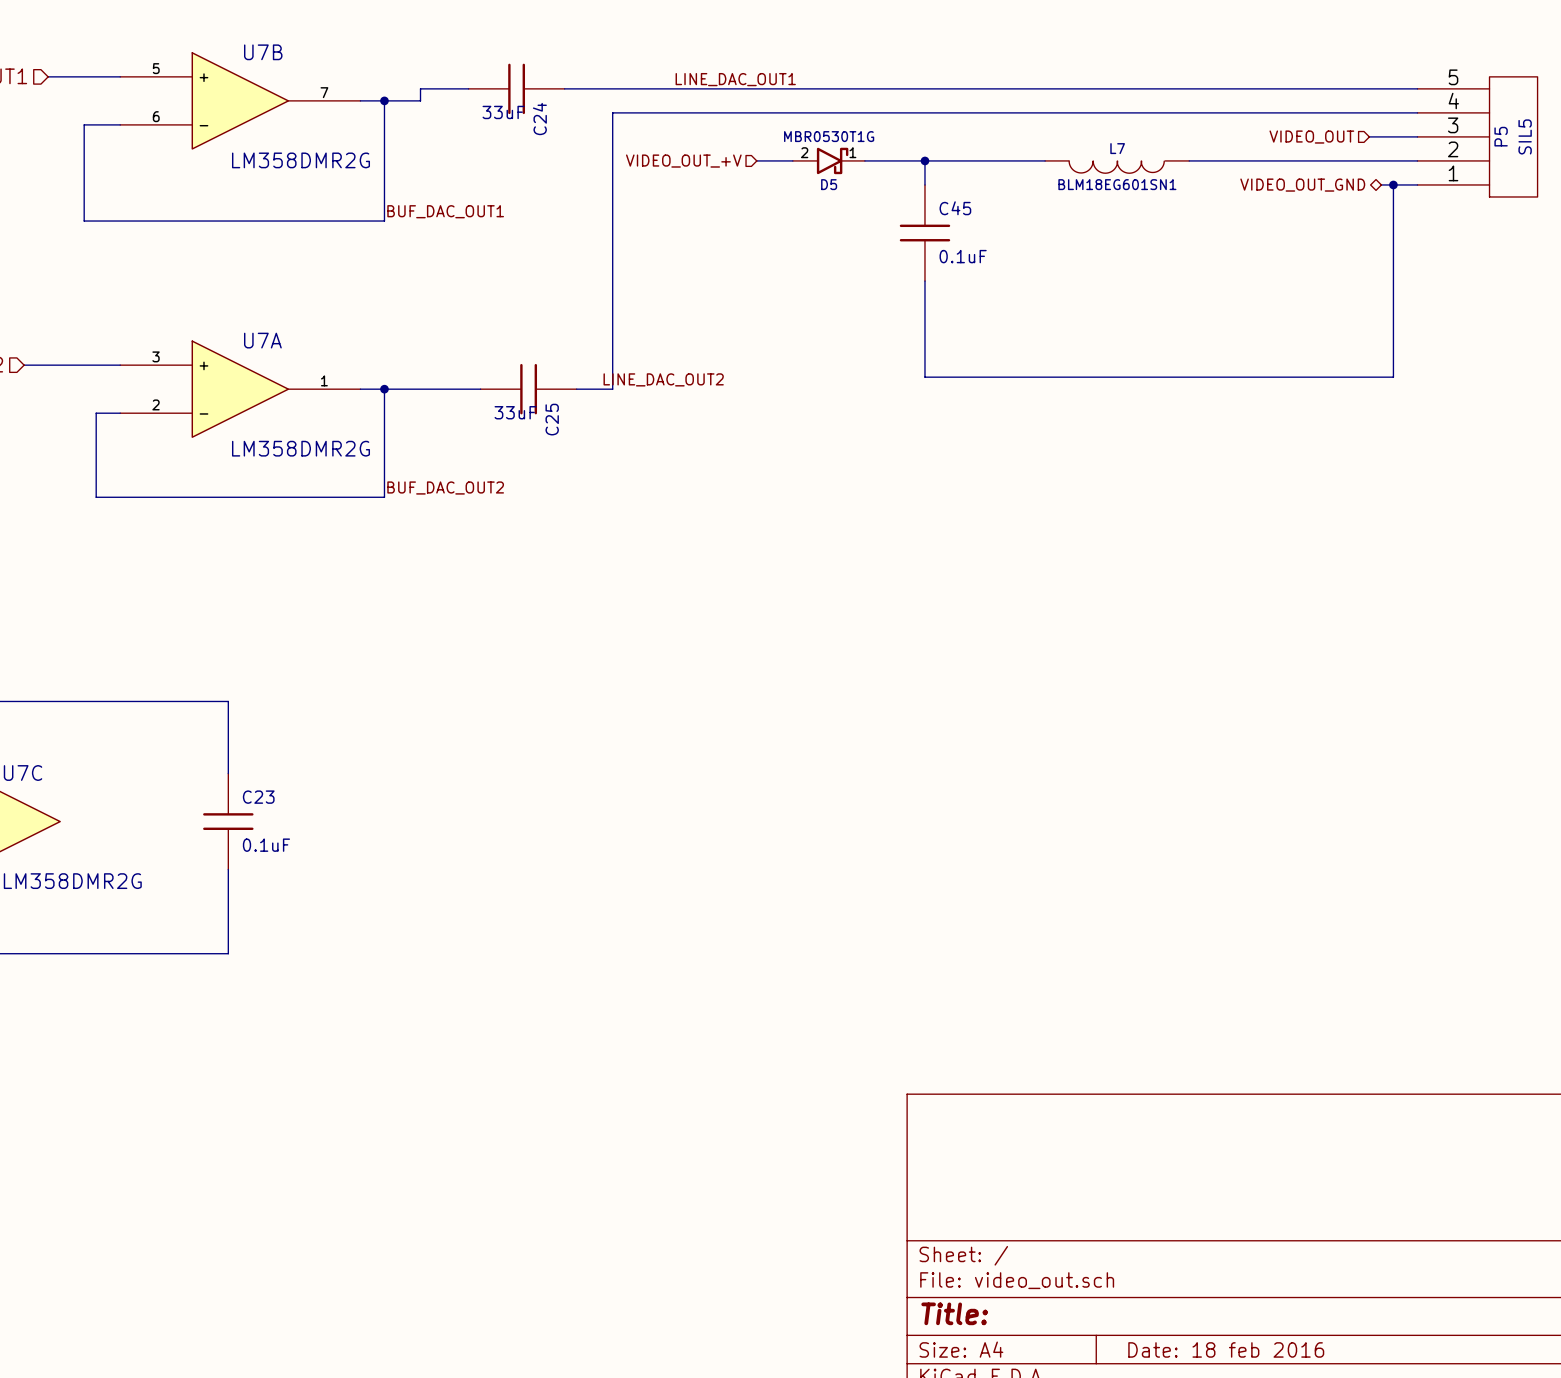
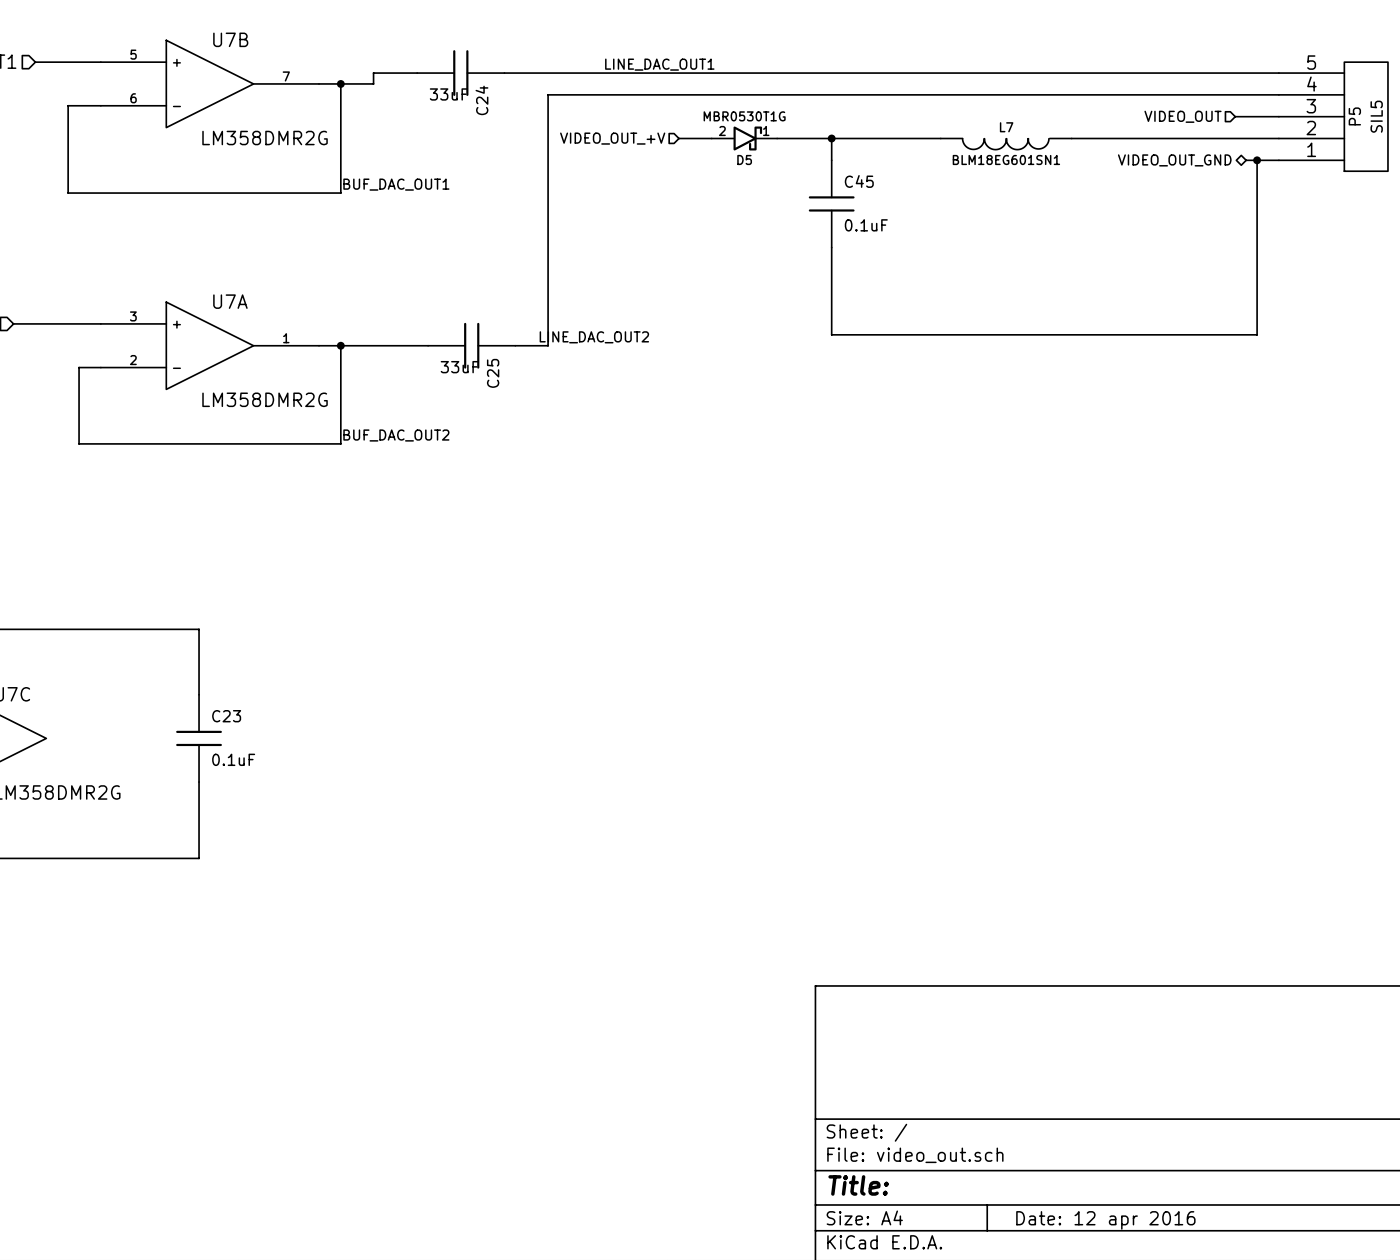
title block: Date: 18 feb 2016 (1226, 1349) -> Date: 12 apr 2016 (1105, 1220)

